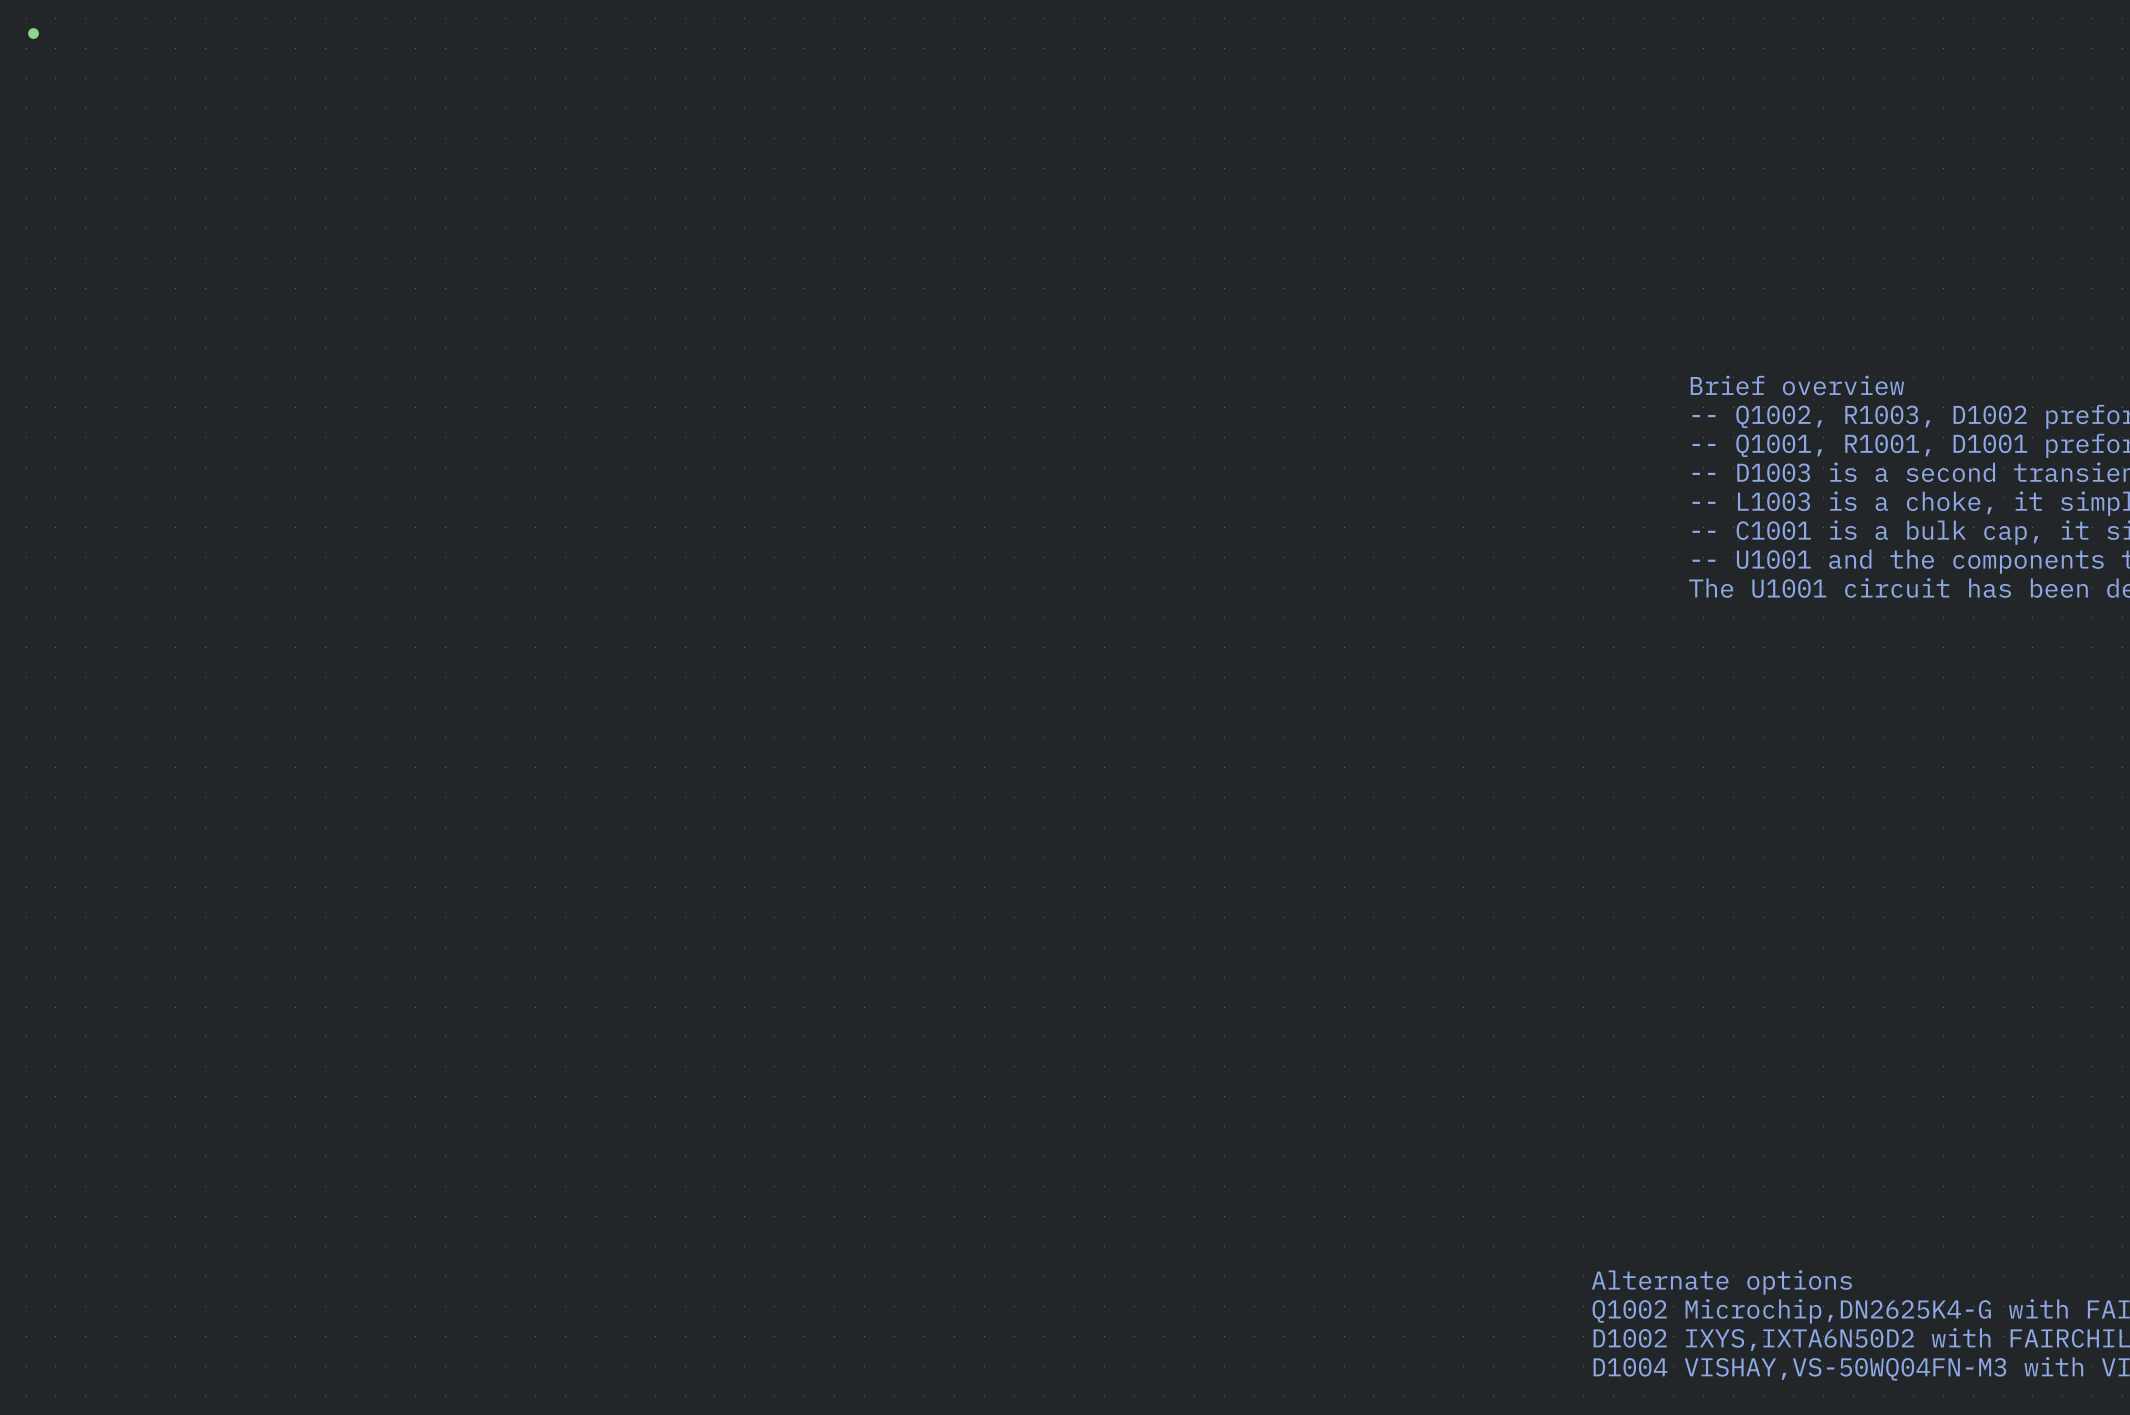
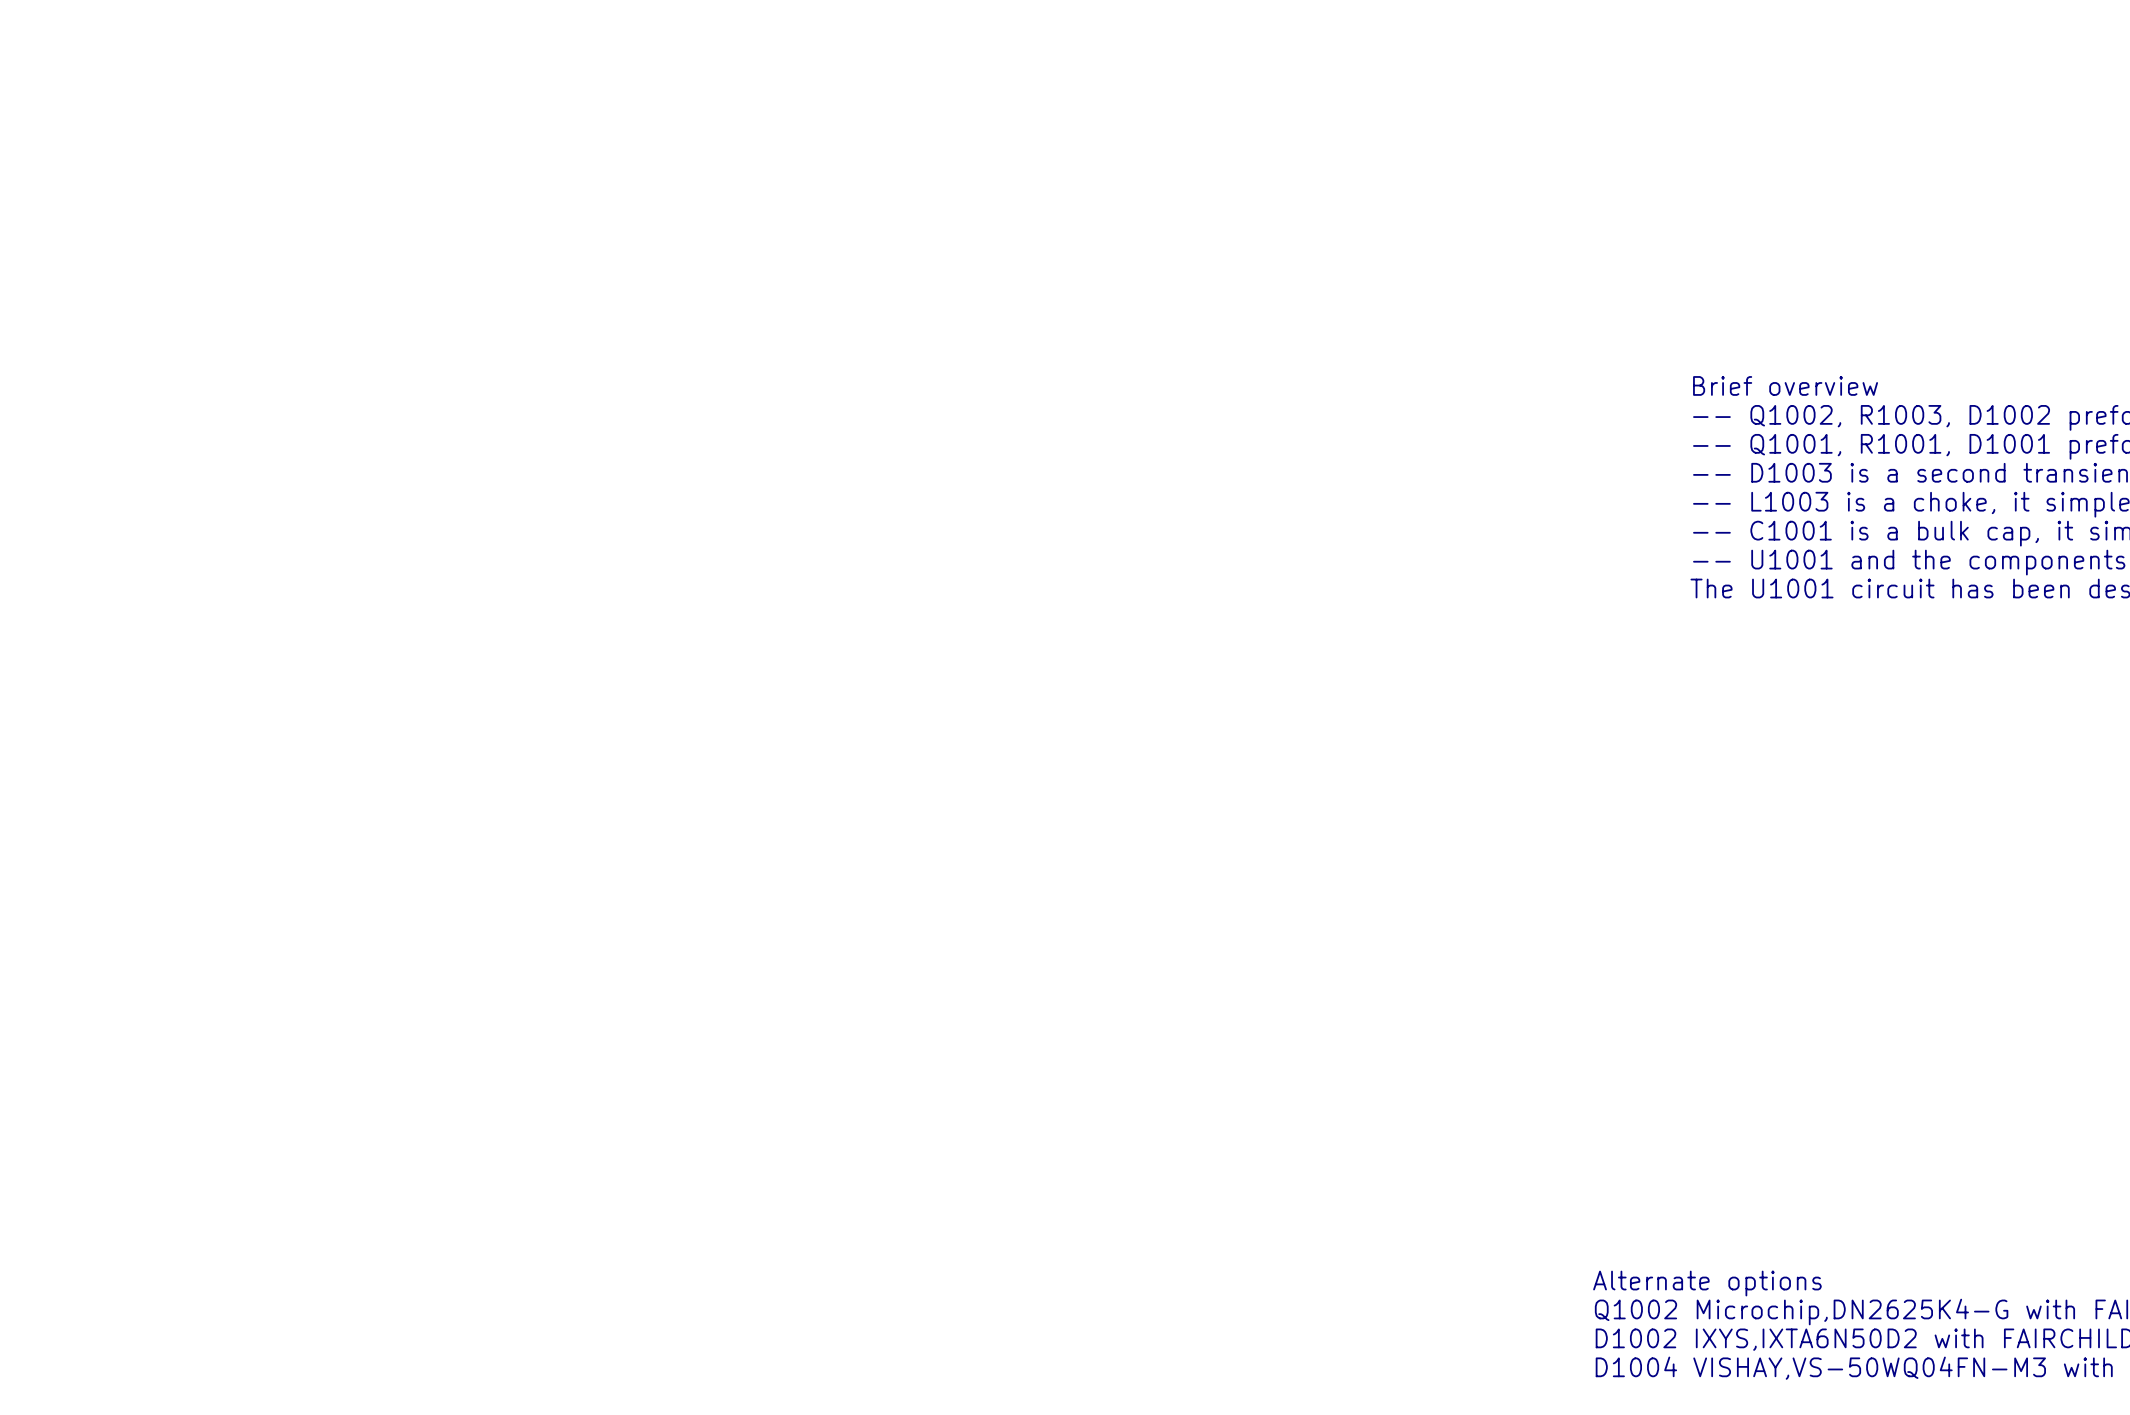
junction: (33, 33) -> none

